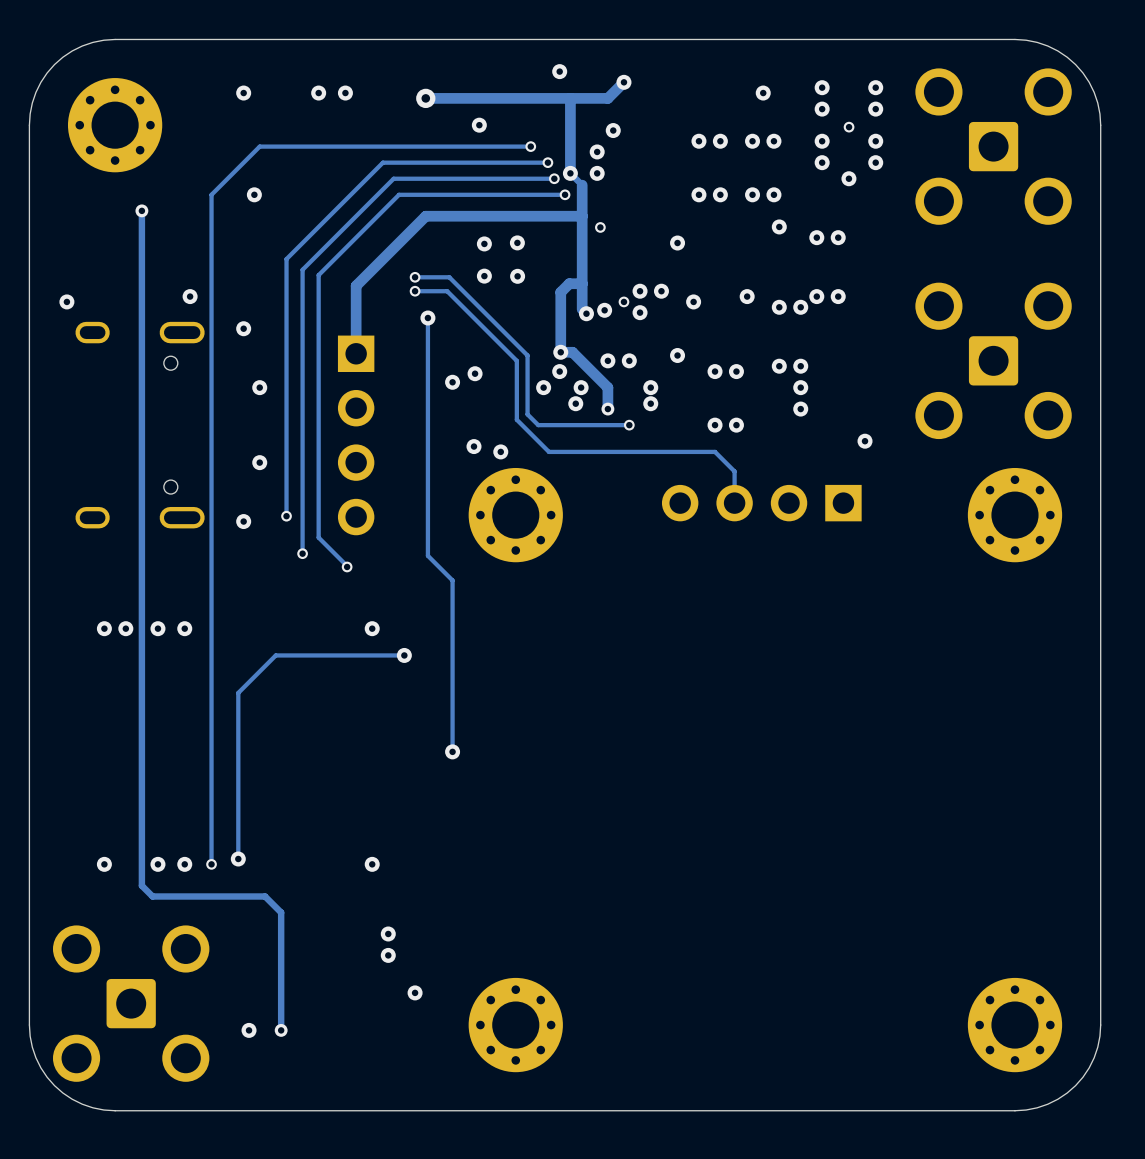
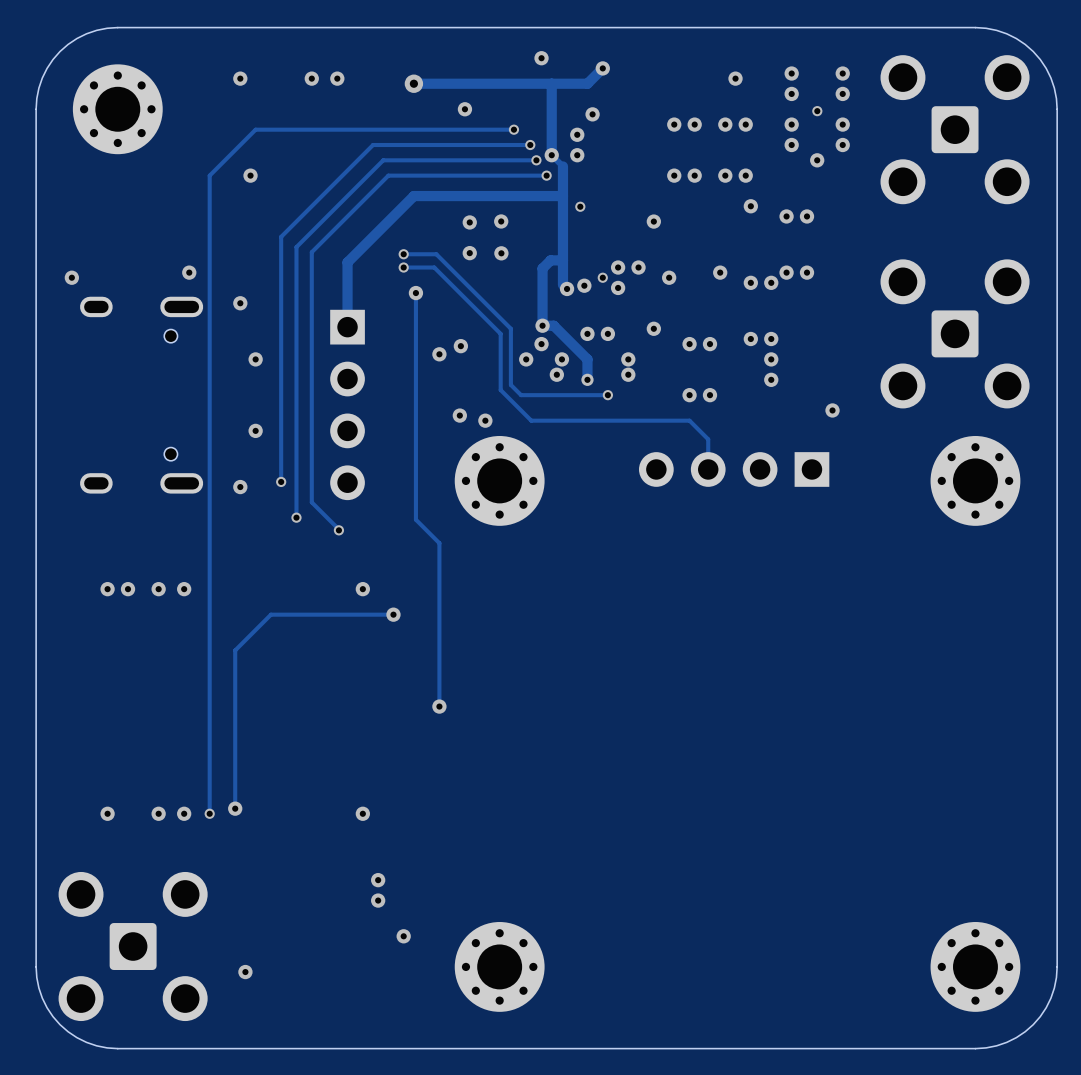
track: (141, 210) (141, 885) (152, 896) (265, 896) (281, 912) (281, 1030) -> none
via: (141, 210) -> none
via: (281, 1030) -> none

